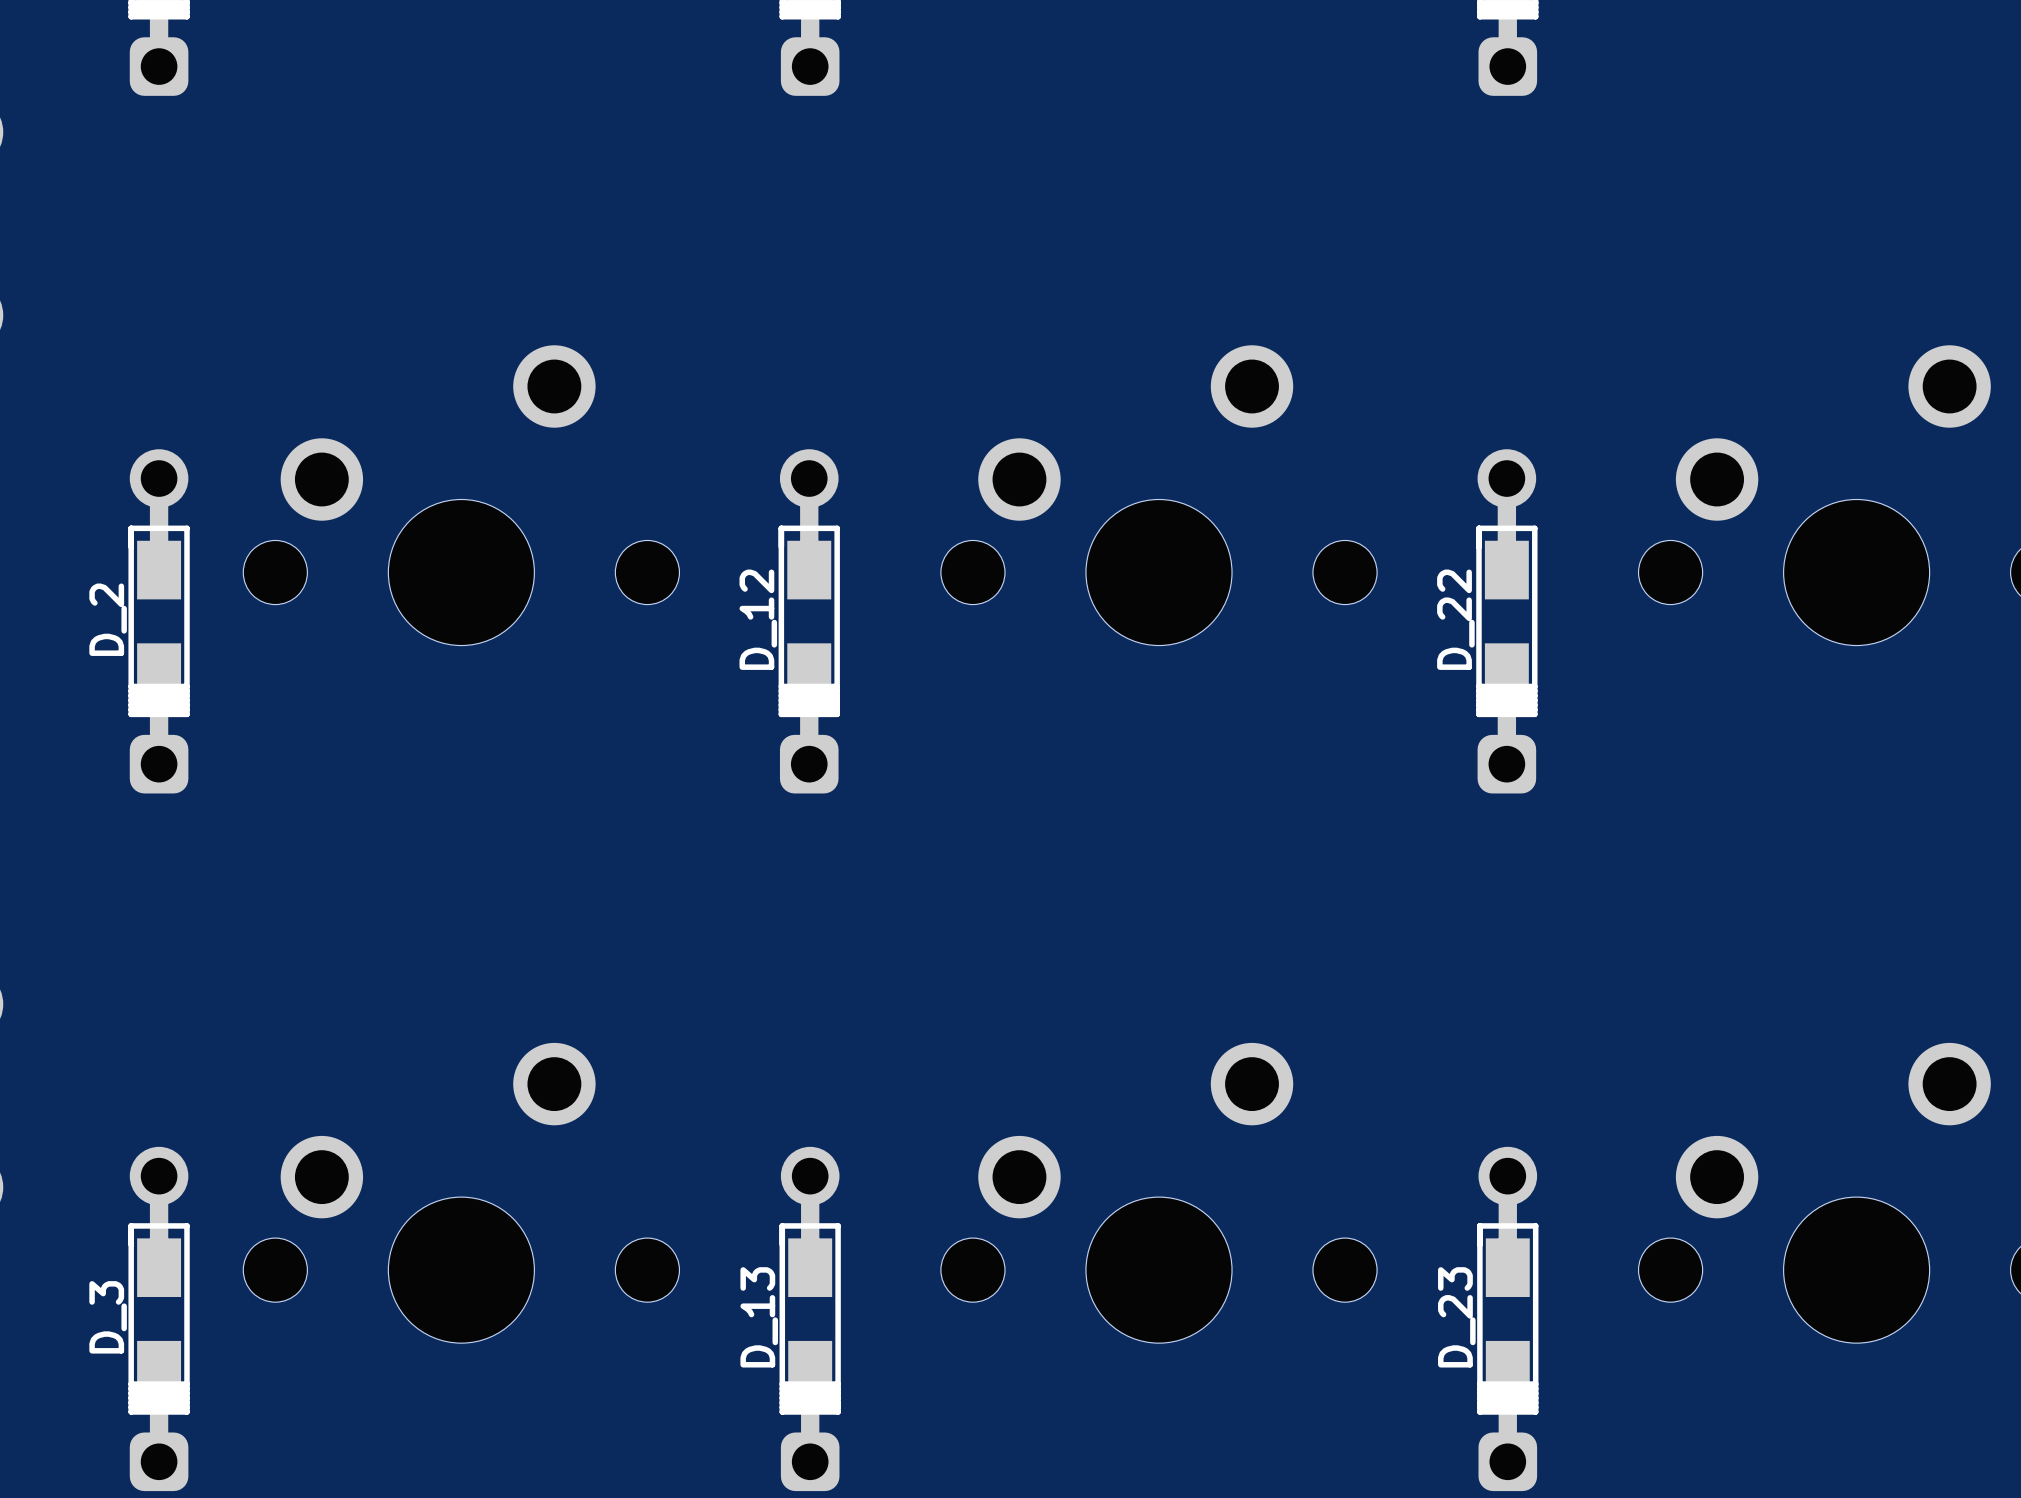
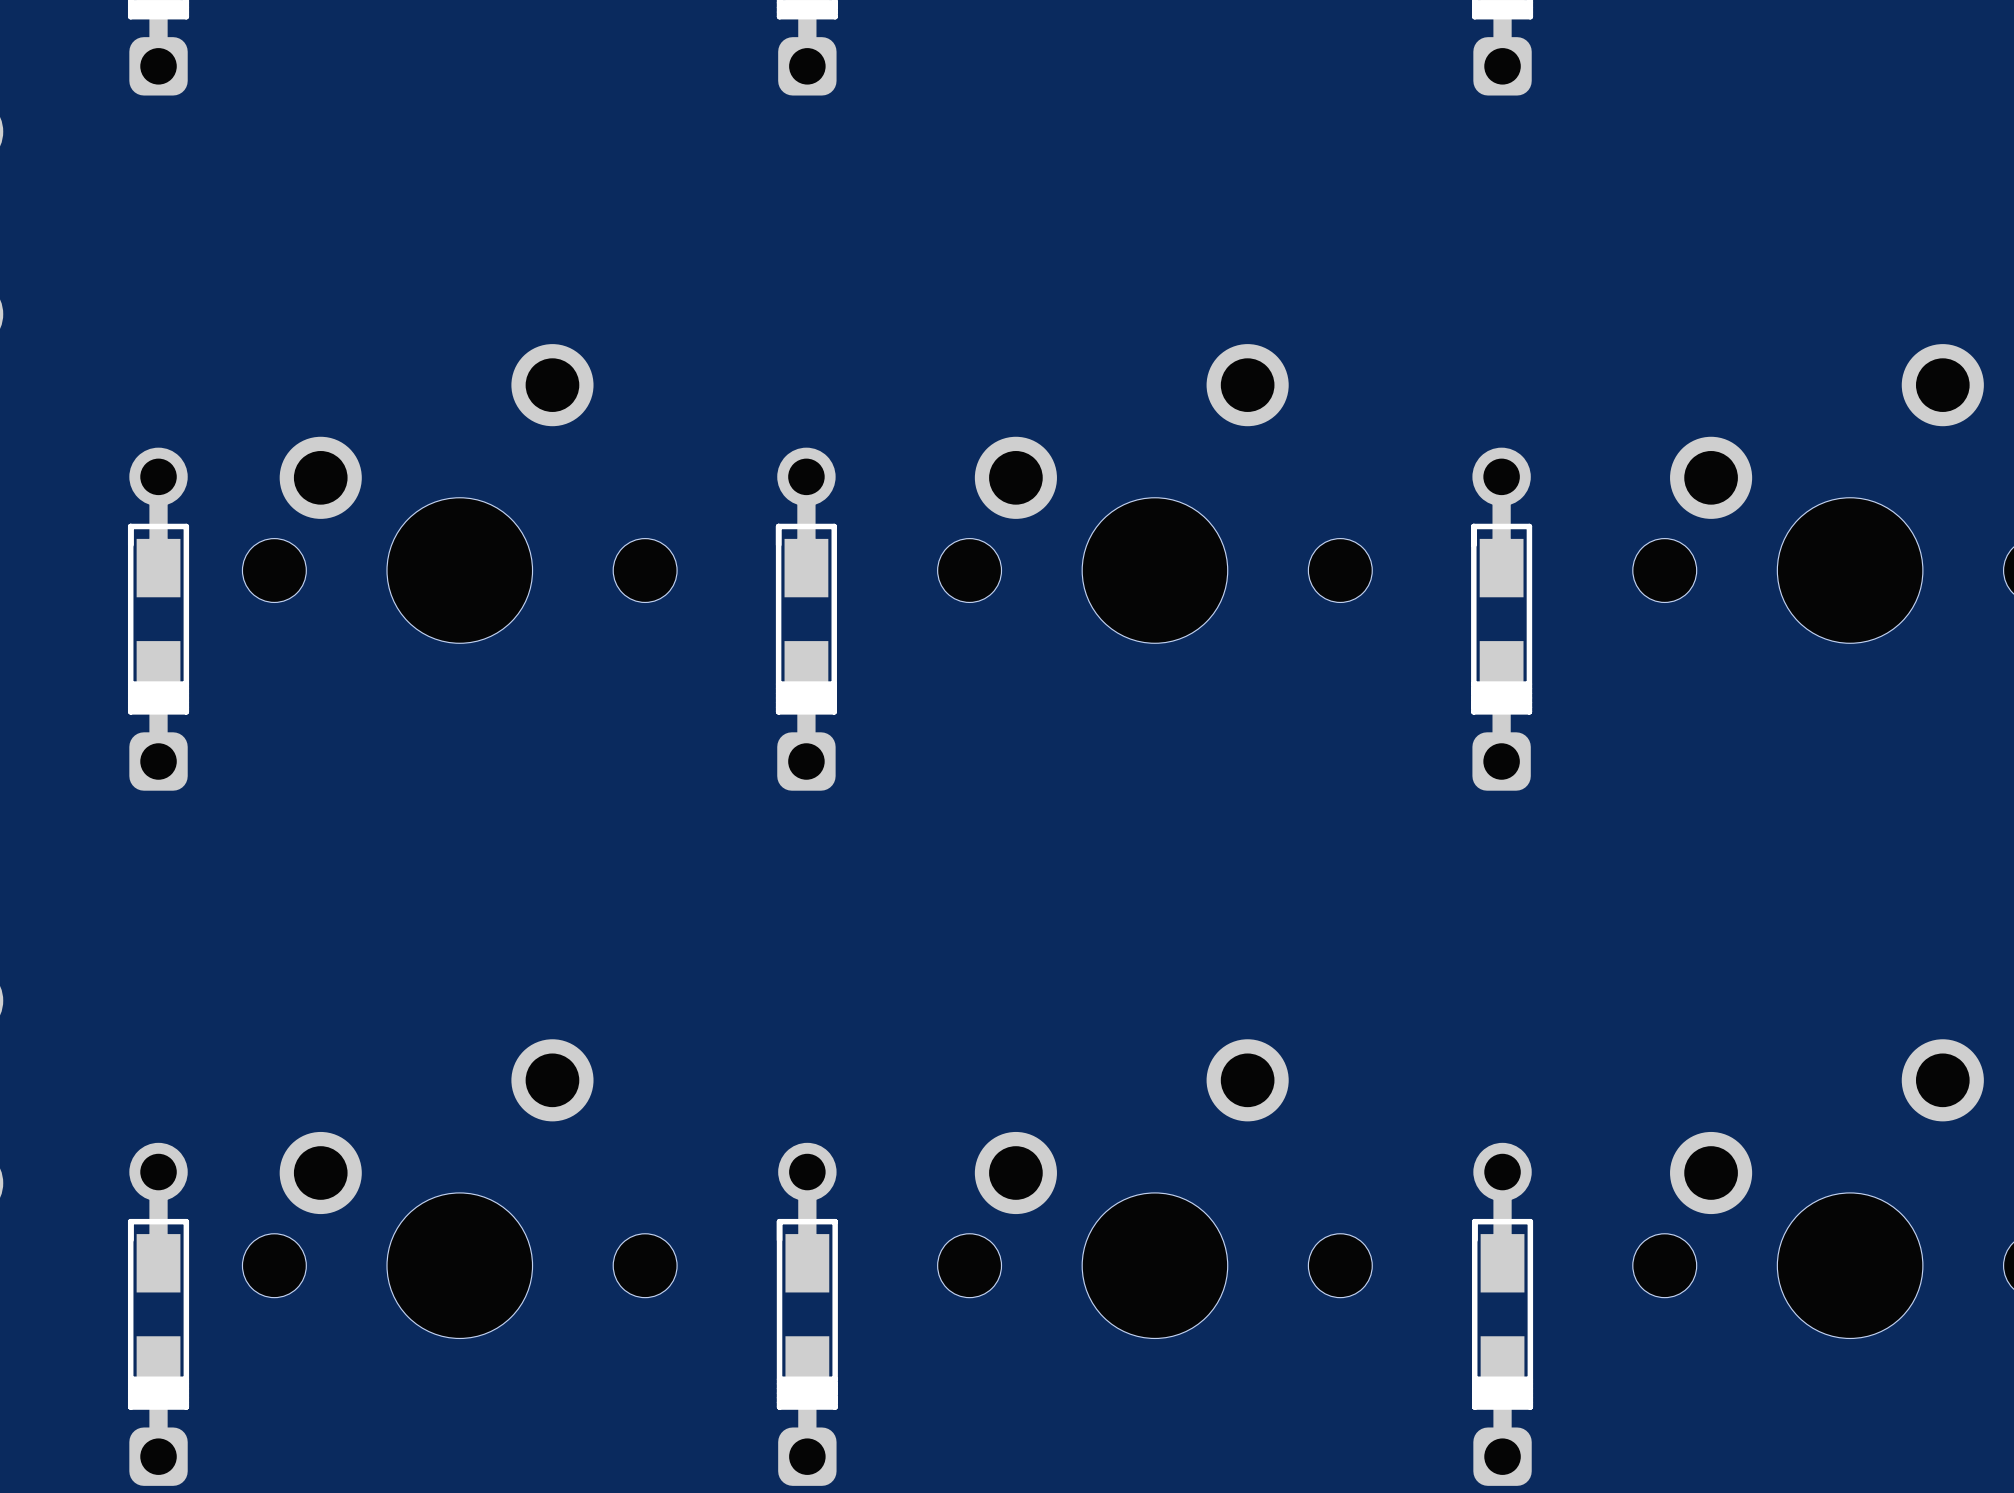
D_2 name: D_2 (108, 619) -> none
D_12 name: D_12 (758, 619) -> none
D_22 name: D_22 (1455, 619) -> none
D_3 name: D_3 (108, 1317) -> none
D_13 name: D_13 (759, 1317) -> none
D_23 name: D_23 (1456, 1317) -> none

